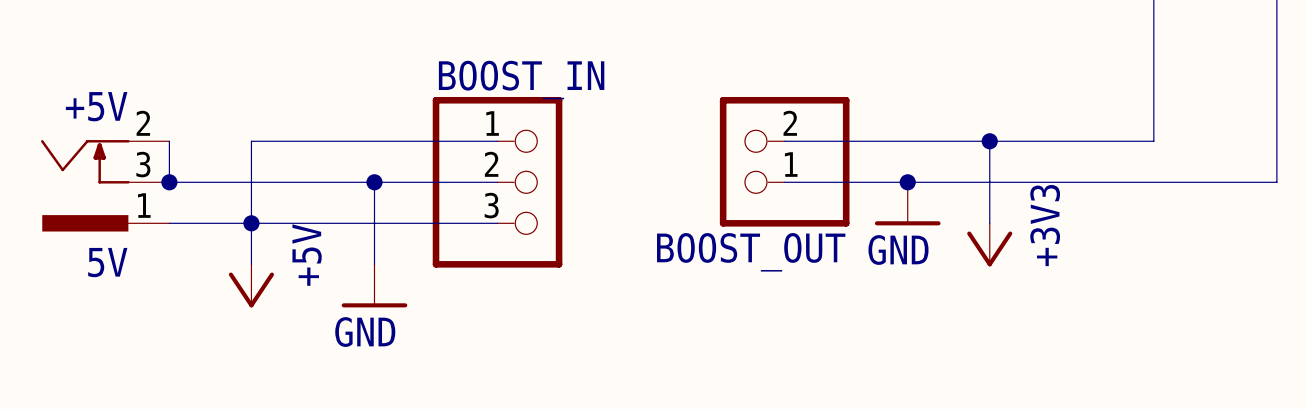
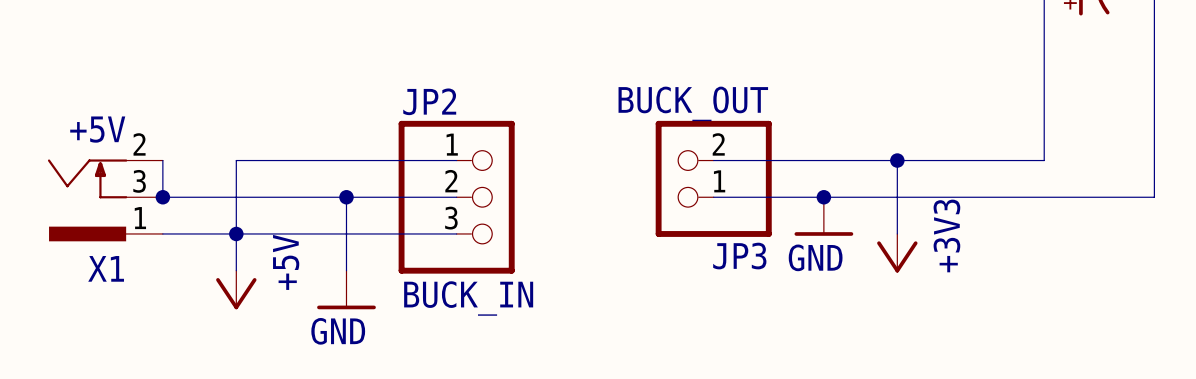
BOOST_OUT value: none -> BUCK_OUT (693, 103)
BOOST_IN name: BOOST_IN (521, 80) -> JP2 (429, 101)
BOOST_OUT name: BOOST_OUT (751, 252) -> JP3 (739, 256)
5V name: 5V (107, 262) -> X1 (106, 268)
BOOST_IN value: none -> BUCK_IN (468, 298)

